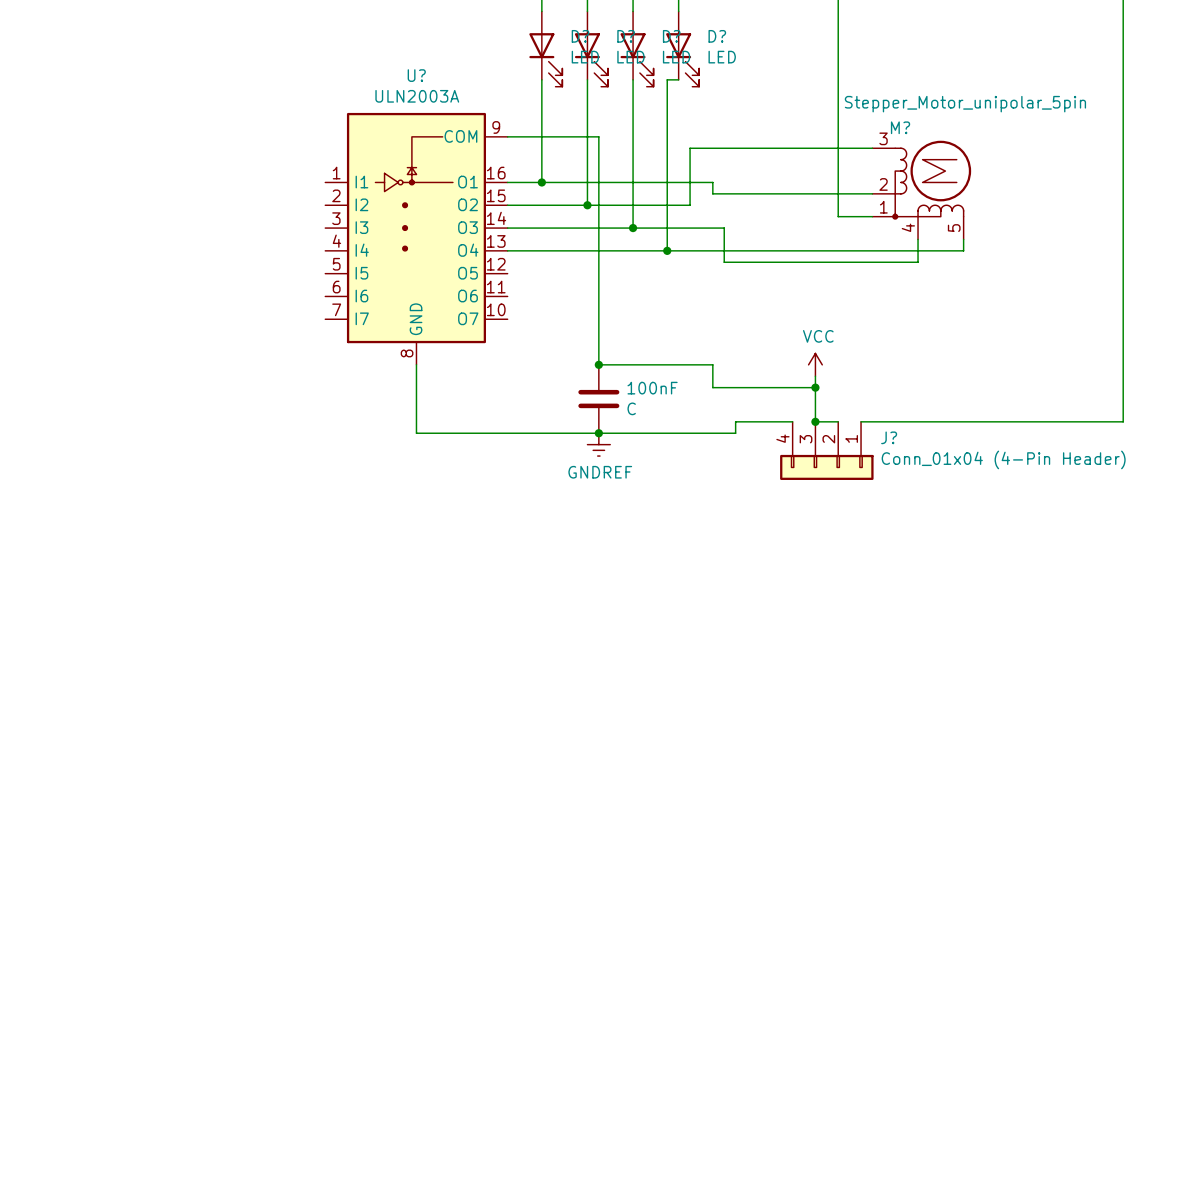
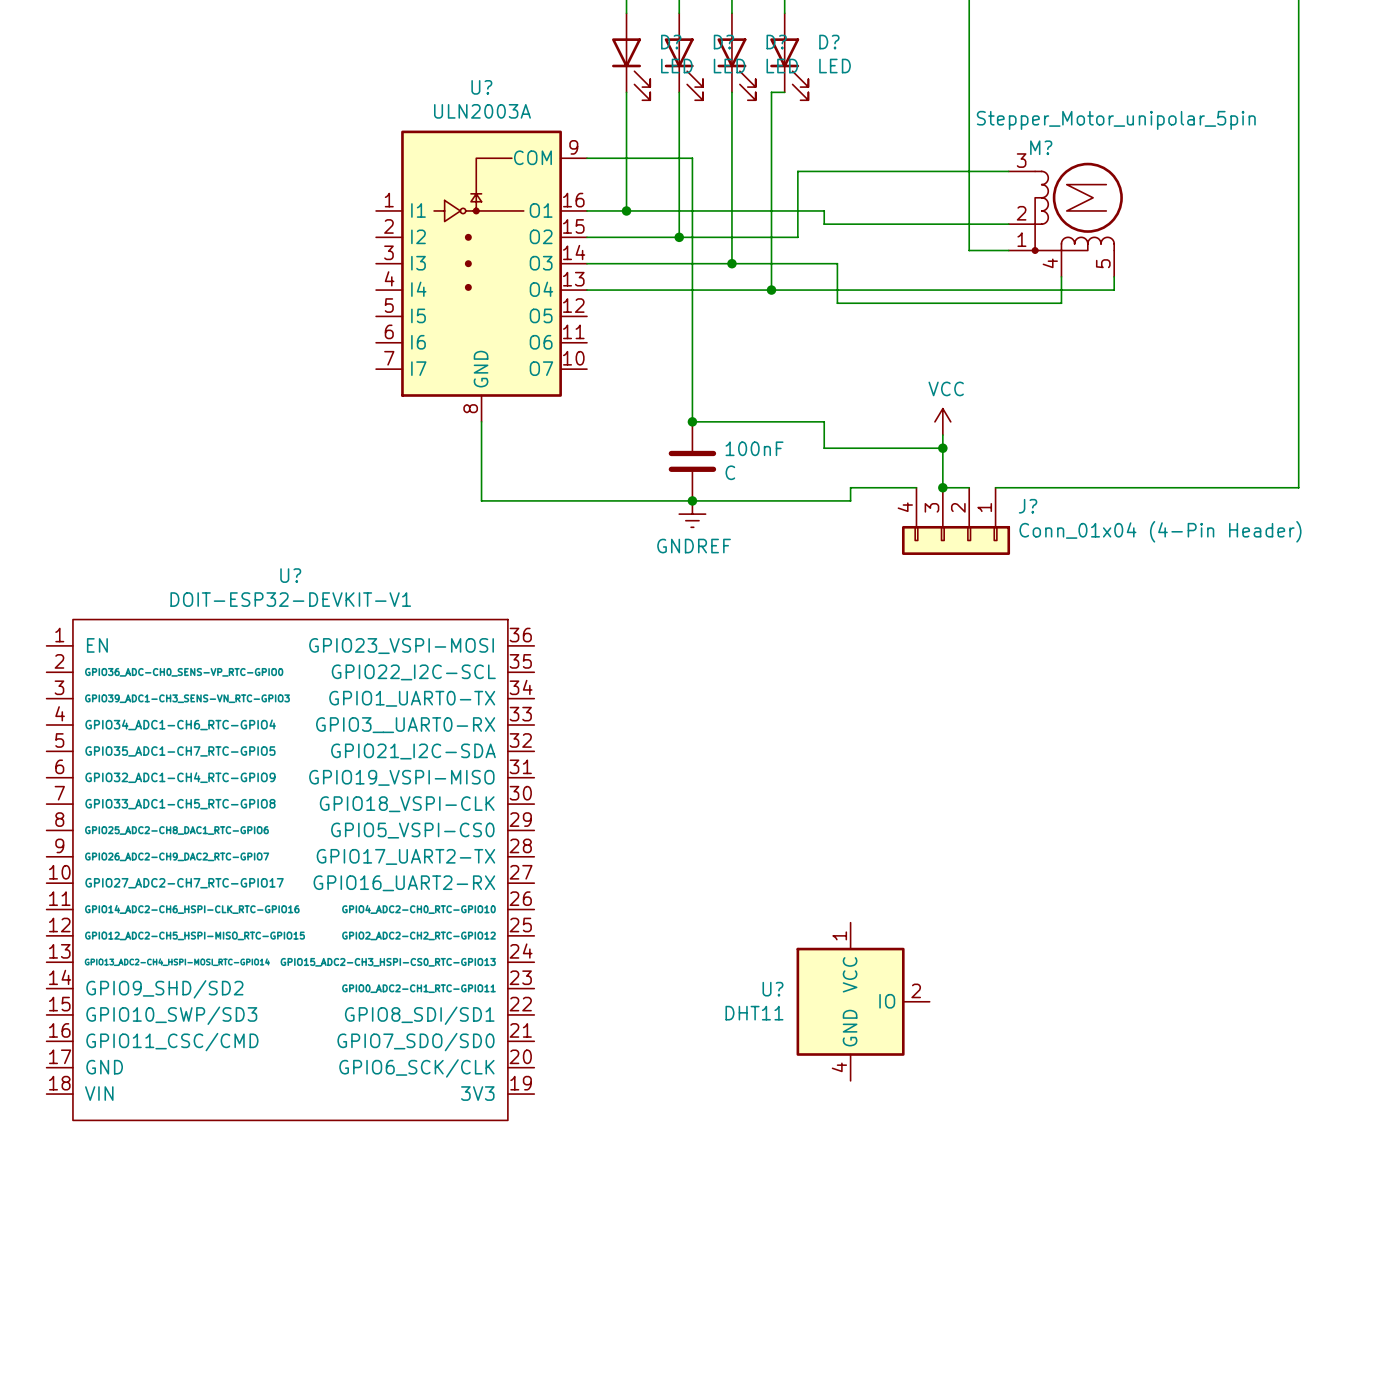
U?: none -> DOIT-ESP32-DEVKIT-V1 (290, 869)
U?: none -> DHT11 (863, 1001)

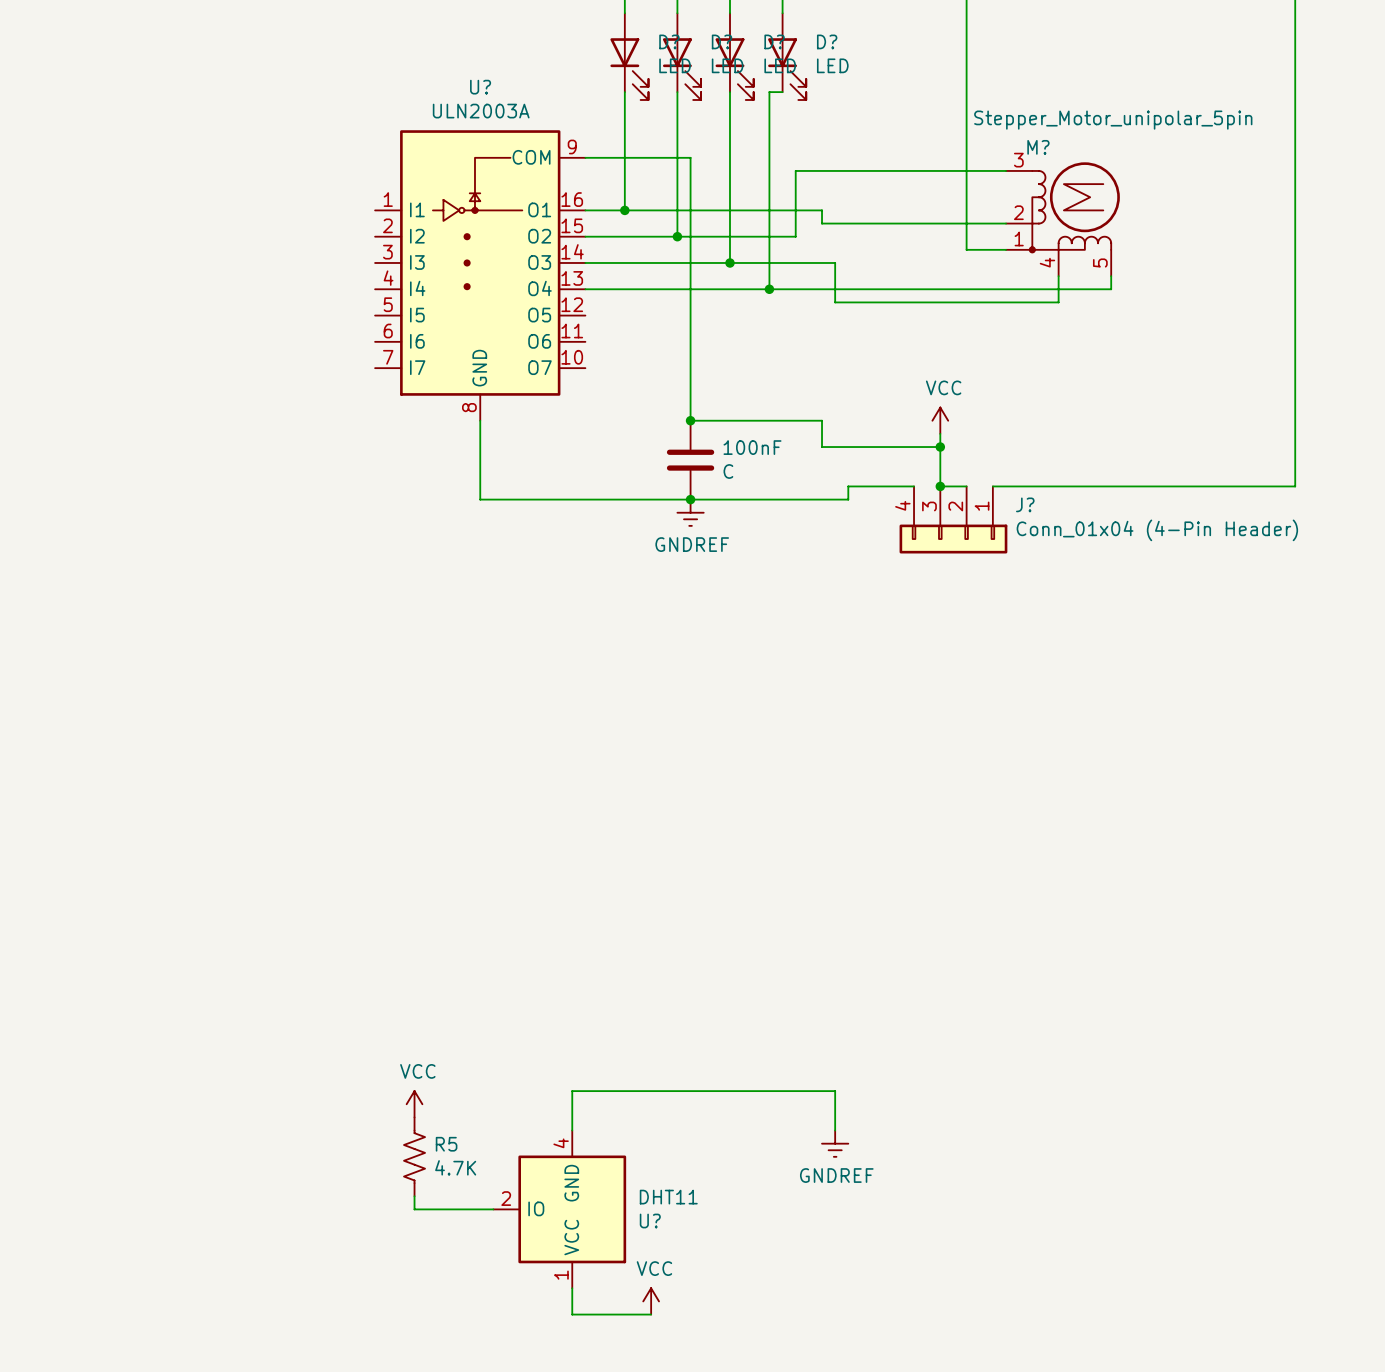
U?: DOIT-ESP32-DEVKIT-V1 (290, 869) -> none
U?: DHT11 (863, 1001) -> none
power symbol: none -> VCC (414, 1104)
wire: none -> (572, 1130) (572, 1091) (835, 1091) (835, 1130)
power symbol: none -> GNDREF (835, 1143)
R5: none -> 4.7K (414, 1156)
wire: none -> (414, 1196) (414, 1209) (493, 1209)
U?: none -> DHT11 (559, 1209)
wire: none -> (572, 1288) (572, 1314) (651, 1314)
power symbol: none -> VCC (651, 1301)

